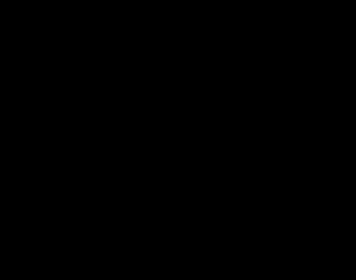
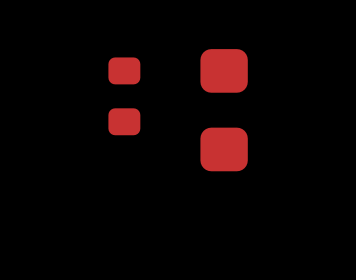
part: none -> (124, 96)
part: none -> (224, 110)

